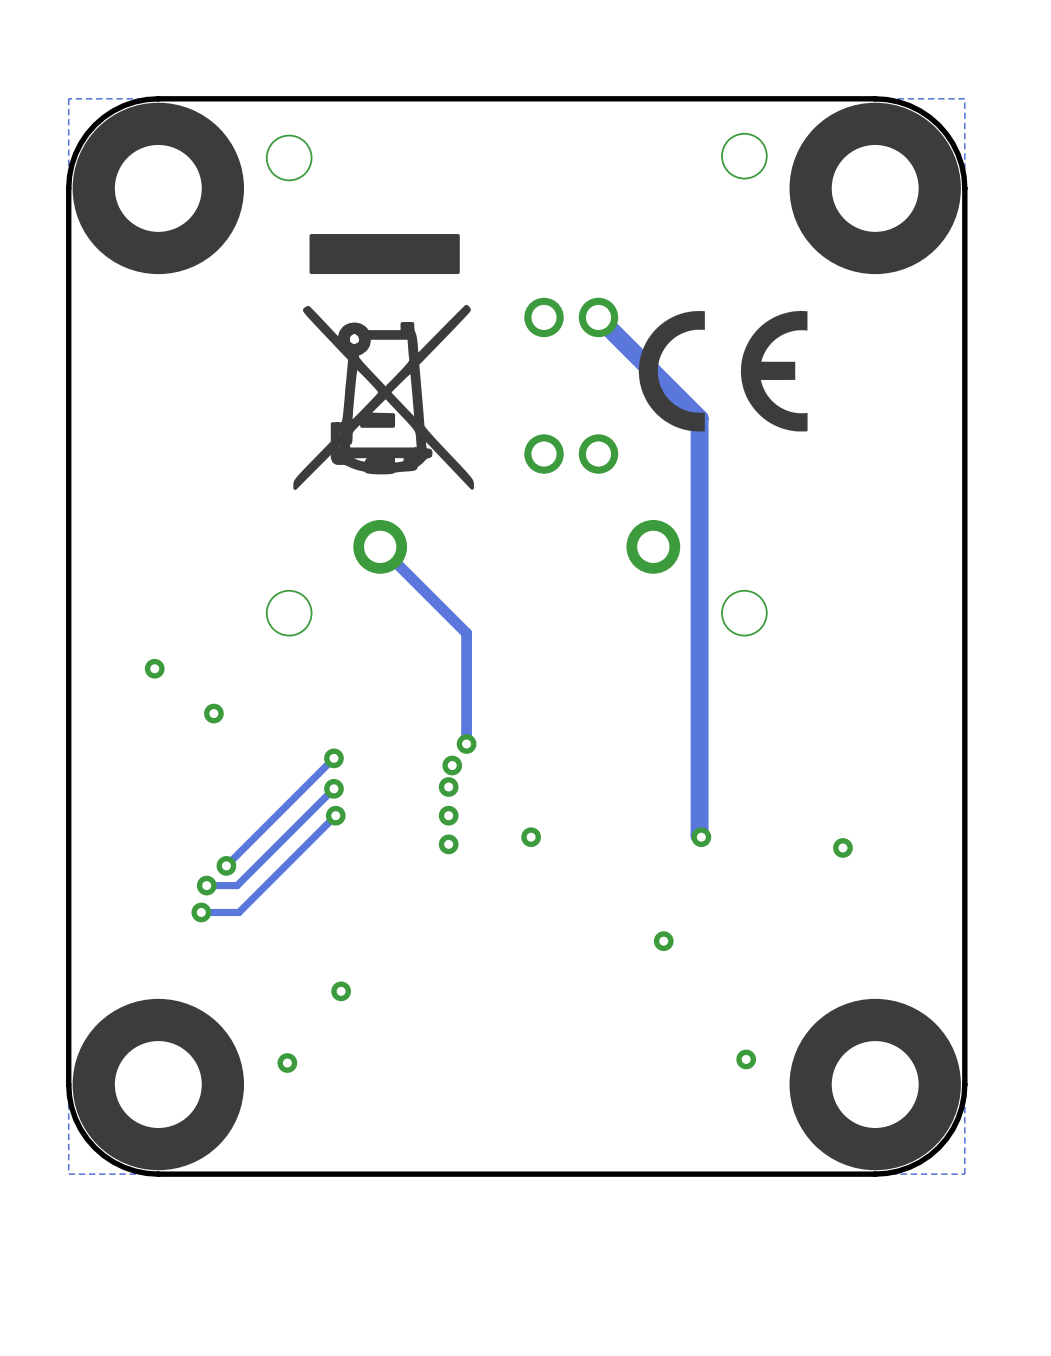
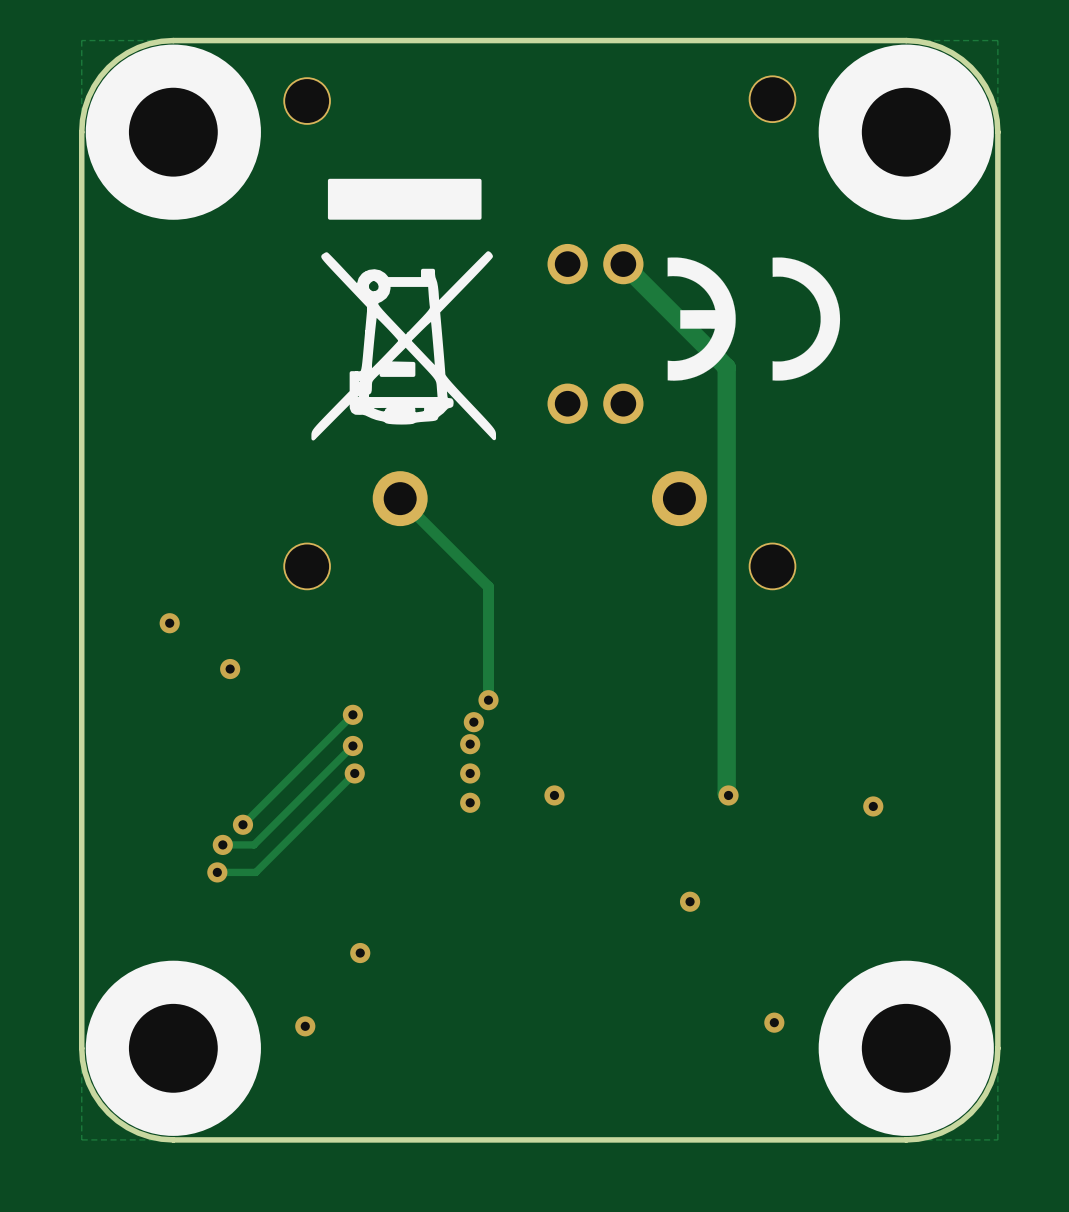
drawing shape: [638, 310, 808, 432] -> [667, 257, 841, 381]

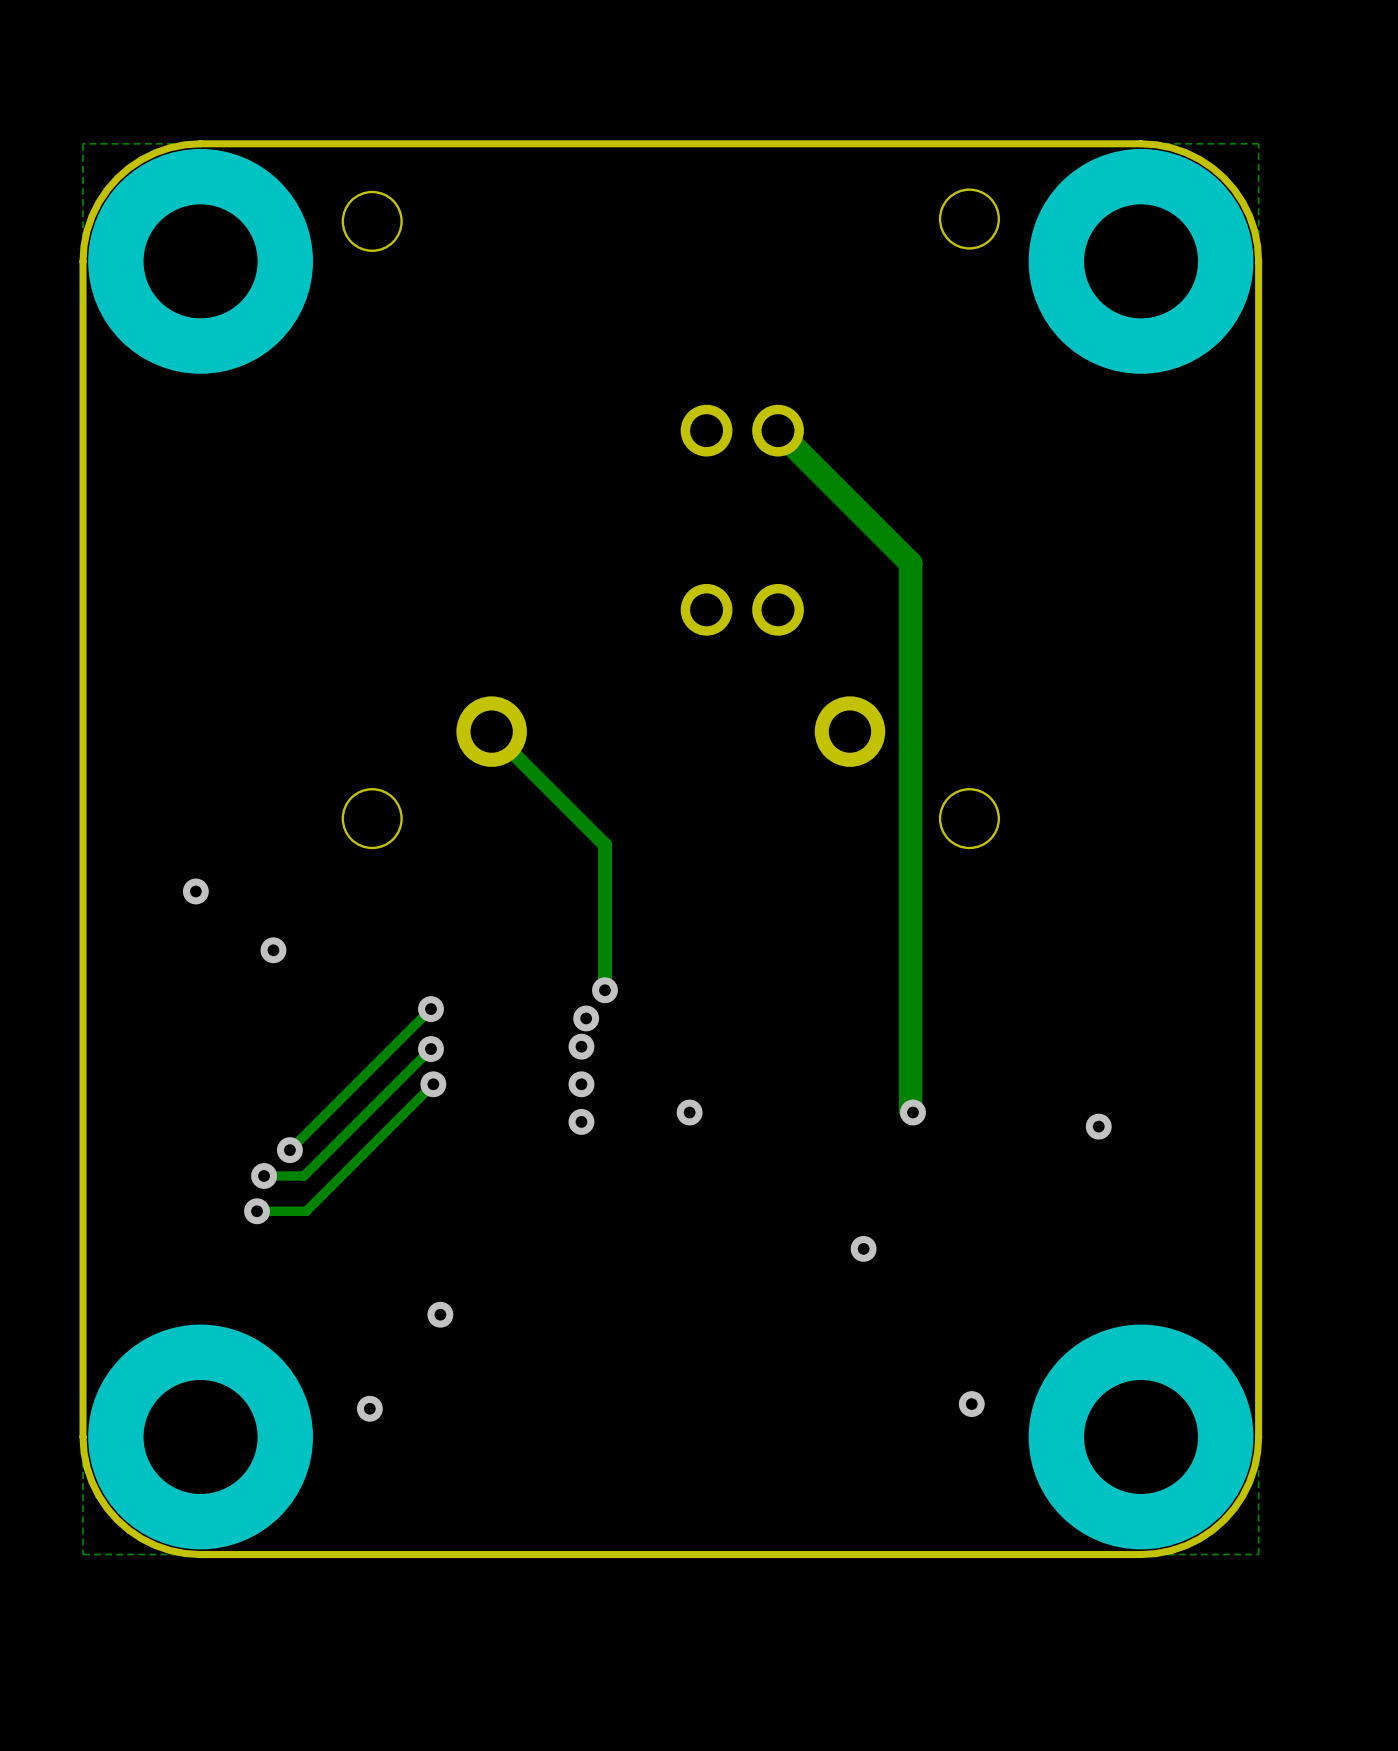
drawing: [311, 178, 497, 441] -> none
drawing: [667, 257, 841, 381] -> none

